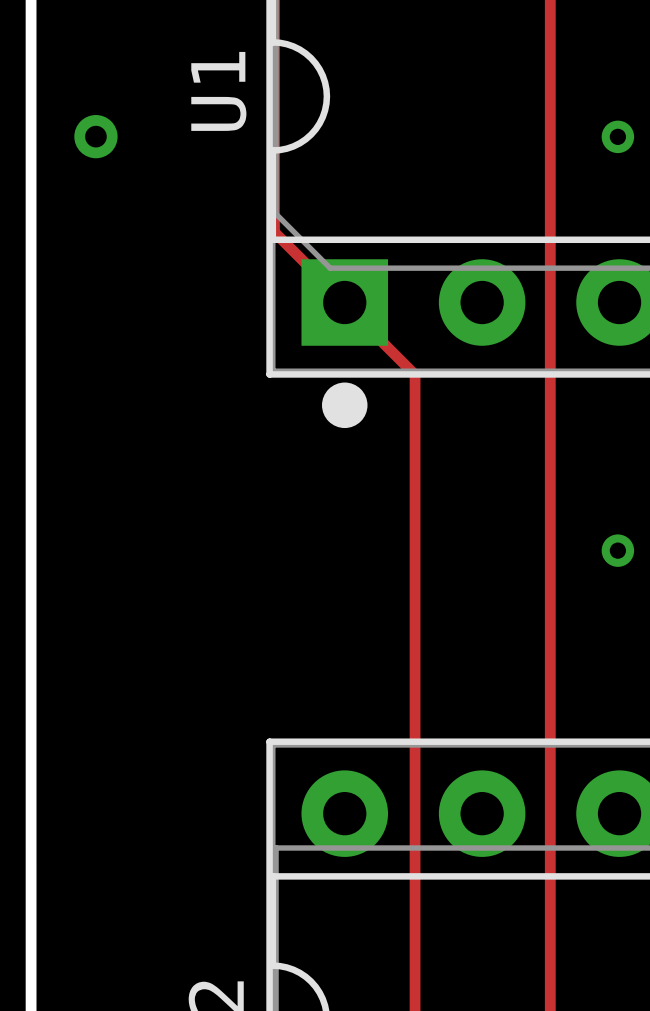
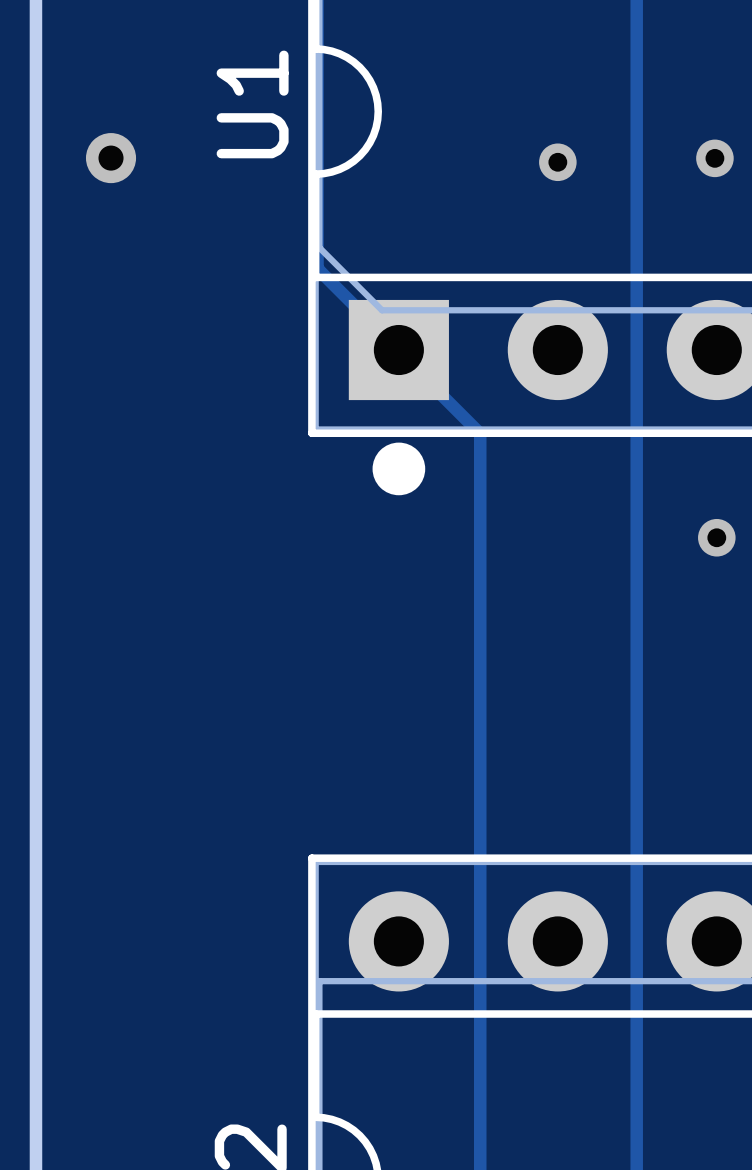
via: none -> (557, 162)
via position: (617, 550) -> (716, 537)

